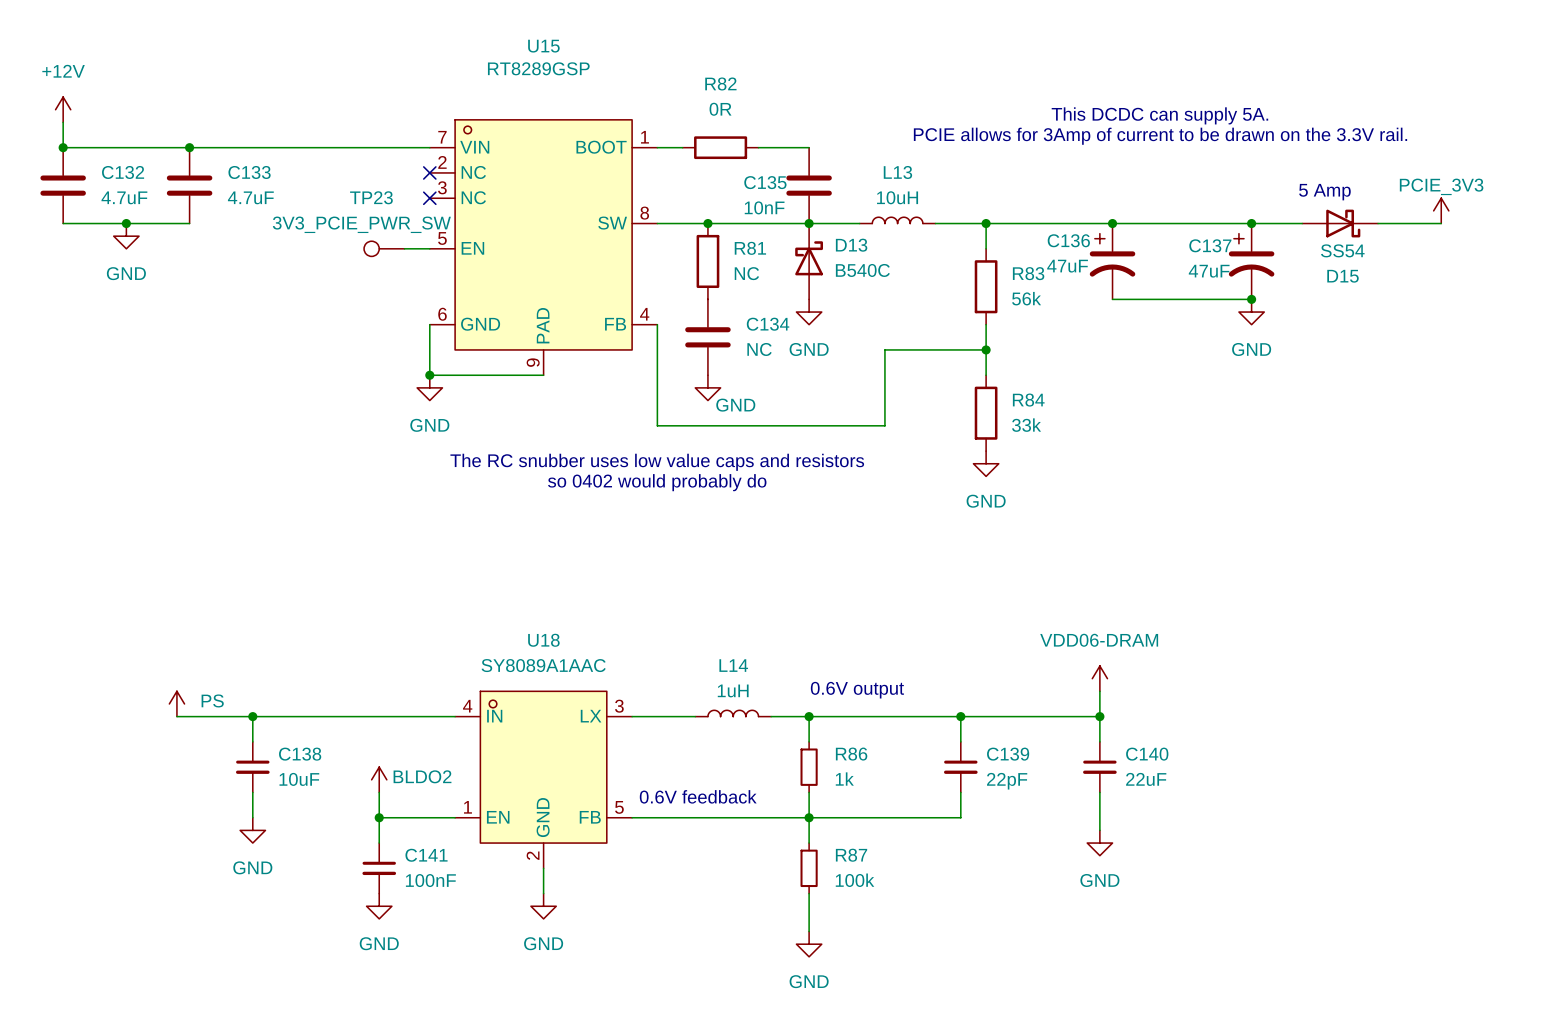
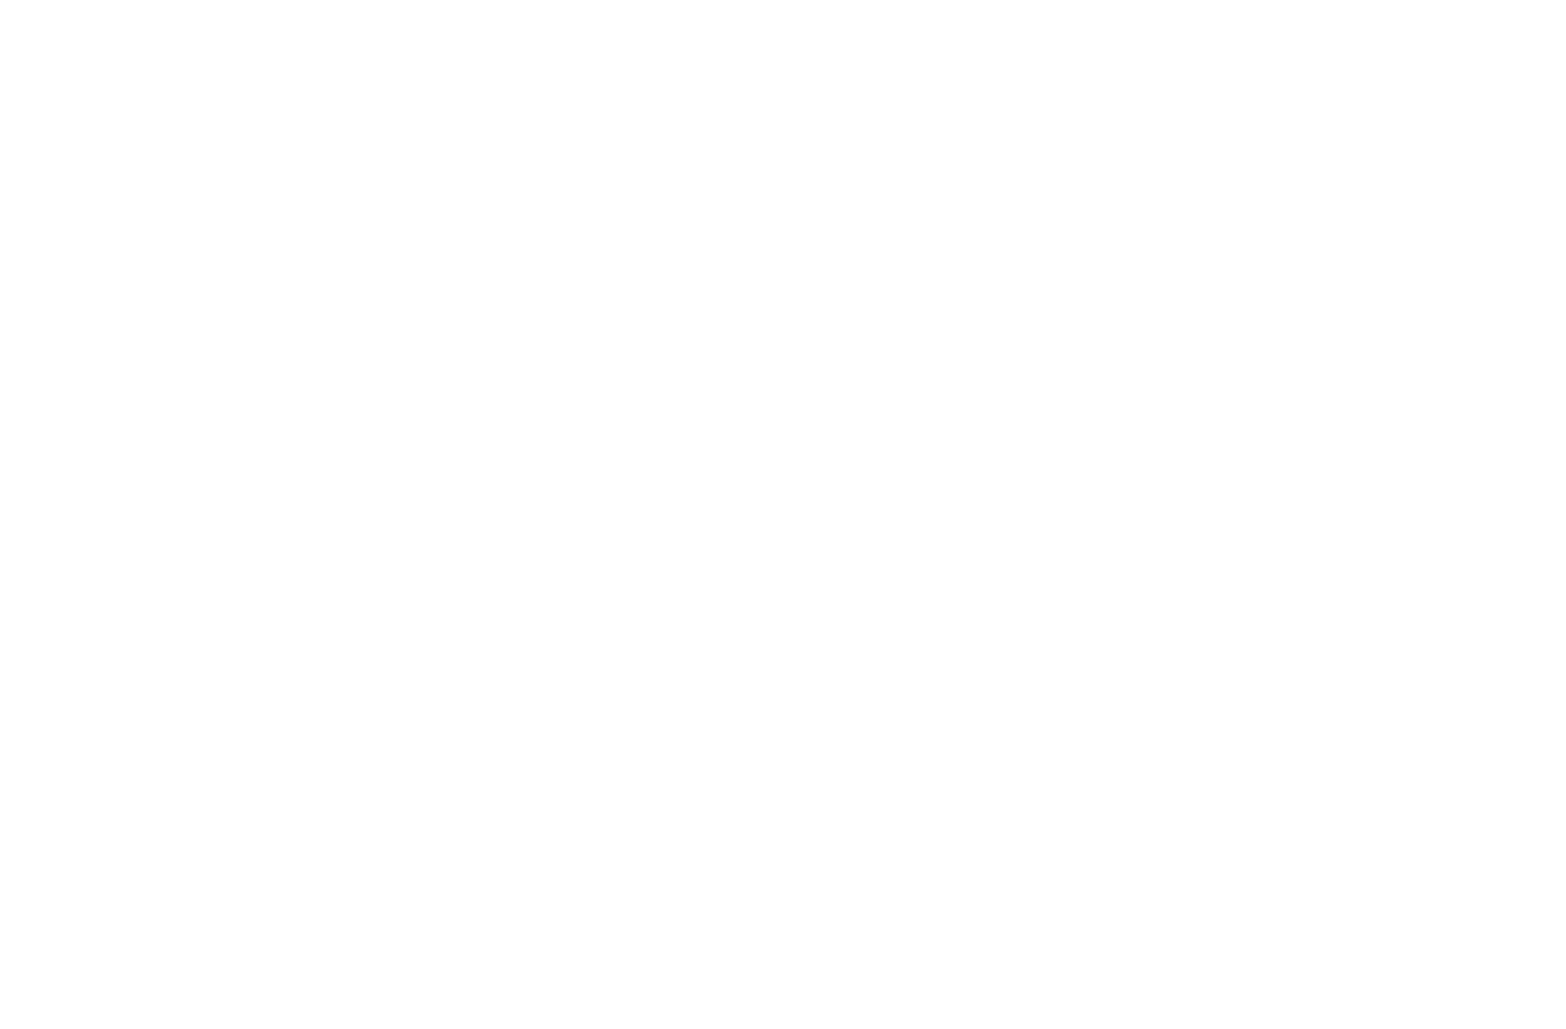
power symbol: +12V (63, 109) -> none
text: This DCDC can supply 5A. (1159, 115) -> none
wire: (63, 122) (63, 147) (429, 147) -> none
text: PCIE allows for 3Amp of current to be drawn on the 3.3V rail. (1160, 136) -> none
junction: (63, 147) -> none
junction: (189, 147) -> none
wire: (657, 147) (682, 147) -> none
R82: 0R (720, 147) -> none
wire: (758, 147) (809, 147) -> none
no-connect mark: (429, 172) -> none
C132: 4.7uF (63, 185) -> none
C133: 4.7uF (189, 185) -> none
C135: 10nF (809, 185) -> none
text: 5 Amp (1324, 192) -> none
no-connect mark: (429, 198) -> none
power symbol: PCIE_3V3 (1441, 210) -> none
L13: 10uH (897, 220) -> none
wire: (63, 223) (189, 223) -> none
junction: (126, 223) -> none
wire: (657, 223) (859, 223) -> none
junction: (707, 223) -> none
junction: (809, 223) -> none
wire: (935, 223) (1302, 223) -> none
wire: (986, 223) (986, 248) -> none
junction: (986, 223) -> none
junction: (1112, 223) -> none
junction: (1251, 223) -> none
D15: SS54 (1340, 223) -> none
wire: (1378, 223) (1441, 223) -> none
power symbol: GND (126, 236) -> none
U15: RT8289GSP (543, 247) -> none
TP23: 3V3_PCIE_PWR_SW (384, 248) -> none
wire: (404, 248) (429, 248) -> none
R81: NC (707, 261) -> none
D13: B540C (809, 261) -> none
C136: 47uF (1112, 261) -> none
C137: 47uF (1251, 261) -> none
R83: 56k (986, 286) -> none
wire: (1112, 299) (1251, 299) -> none
junction: (1251, 299) -> none
power symbol: GND (809, 312) -> none
power symbol: GND (1251, 312) -> none
wire: (429, 324) (429, 375) (543, 375) -> none
wire: (657, 324) (657, 425) (884, 425) (884, 349) (986, 349) -> none
wire: (986, 324) (986, 375) -> none
C134: NC (707, 337) -> none
junction: (986, 349) -> none
junction: (429, 375) -> none
power symbol: GND (429, 387) -> none
power symbol: GND (707, 387) -> none
R84: 33k (986, 413) -> none
text: The RC snubber uses low value caps and resistors (657, 462) -> none
power symbol: GND (986, 463) -> none
text: so 0402 would probably do (657, 482) -> none
power symbol: VDD06-DRAM (1099, 678) -> none
text: 0.6V output (857, 690) -> none
wire: (1099, 691) (1099, 741) -> none
power symbol: PS (176, 703) -> none
L14: 1uH (733, 713) -> none
wire: (176, 716) (455, 716) -> none
wire: (252, 716) (252, 741) -> none
junction: (252, 716) -> none
wire: (632, 716) (695, 716) -> none
wire: (771, 716) (1099, 716) -> none
wire: (809, 716) (809, 741) -> none
junction: (809, 716) -> none
wire: (960, 716) (960, 741) -> none
junction: (960, 716) -> none
junction: (1099, 716) -> none
C138: 10uF (252, 767) -> none
R86: 1k (809, 767) -> none
C139: 22pF (960, 767) -> none
C140: 22uF (1099, 767) -> none
power symbol: BLDO2 (379, 779) -> none
U18: SY8089A1AAC (543, 779) -> none
wire: (252, 792) (252, 817) -> none
wire: (379, 792) (379, 843) -> none
wire: (809, 792) (809, 843) -> none
wire: (960, 792) (960, 817) (632, 817) -> none
wire: (1099, 792) (1099, 830) -> none
text: 0.6V feedback (698, 796) -> none
wire: (379, 817) (455, 817) -> none
junction: (379, 817) -> none
junction: (809, 817) -> none
power symbol: GND (252, 830) -> none
power symbol: GND (1099, 843) -> none
C141: 100nF (379, 868) -> none
wire: (543, 868) (543, 893) -> none
R87: 100k (809, 868) -> none
wire: (809, 893) (809, 931) -> none
power symbol: GND (379, 906) -> none
power symbol: GND (543, 906) -> none
power symbol: GND (809, 944) -> none

